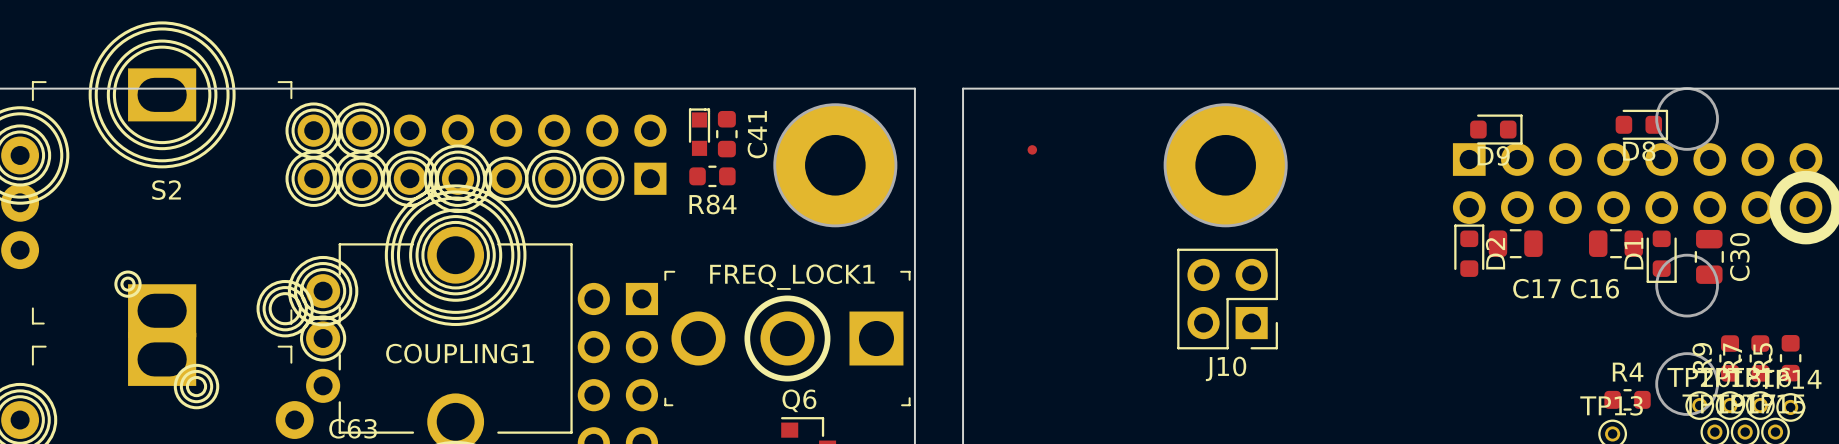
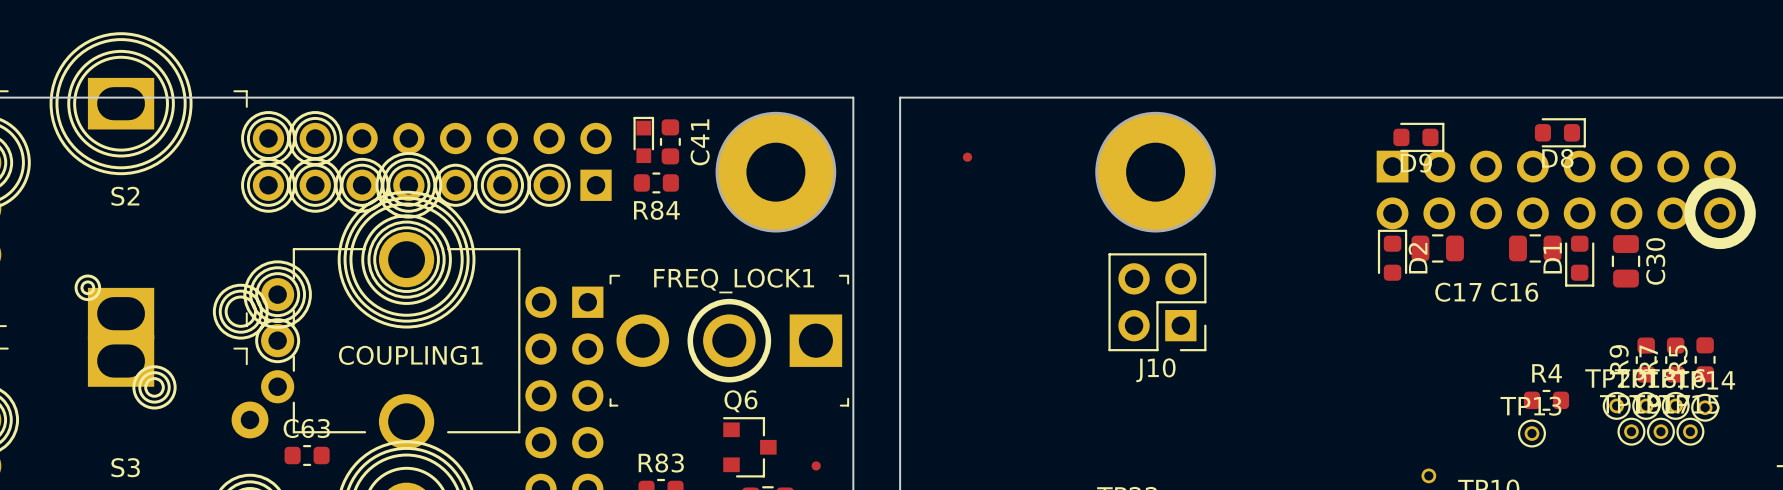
drawing: [1655, 87, 1719, 151] -> none
drawing: [1655, 253, 1719, 318] -> none
drawing: [1655, 352, 1719, 416] -> none

